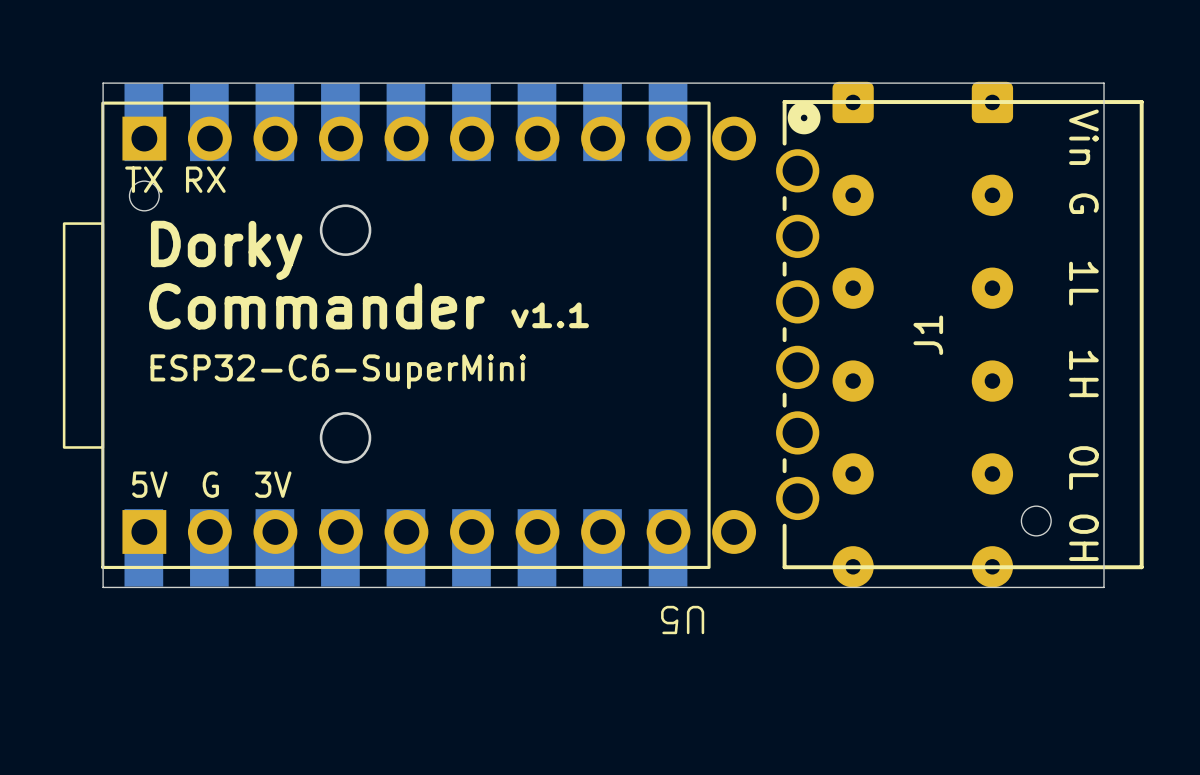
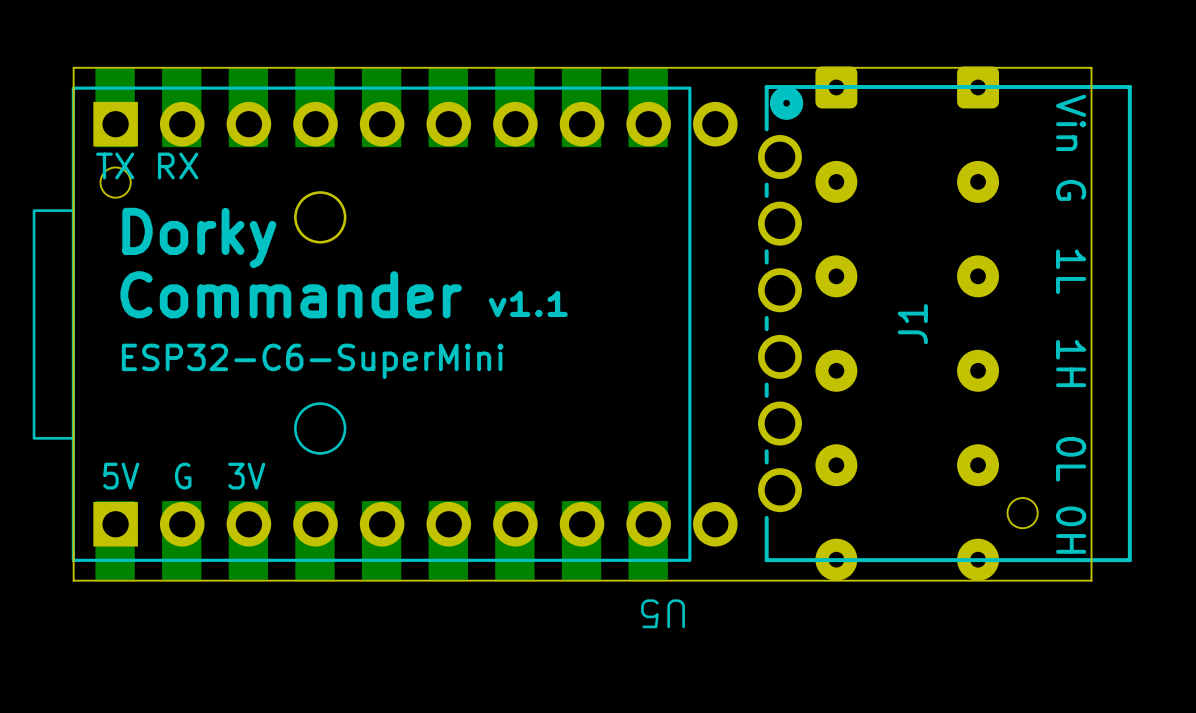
round board edge: [319, 412, 372, 464] -> none
drawing: none -> [294, 402, 347, 455]

